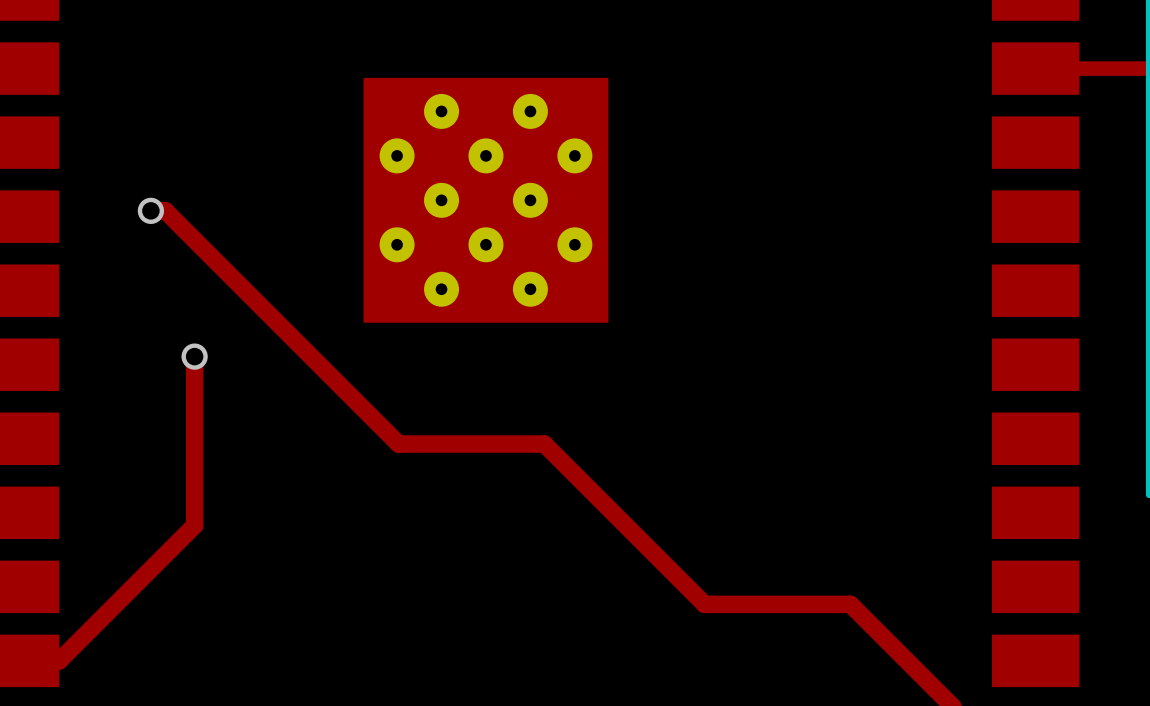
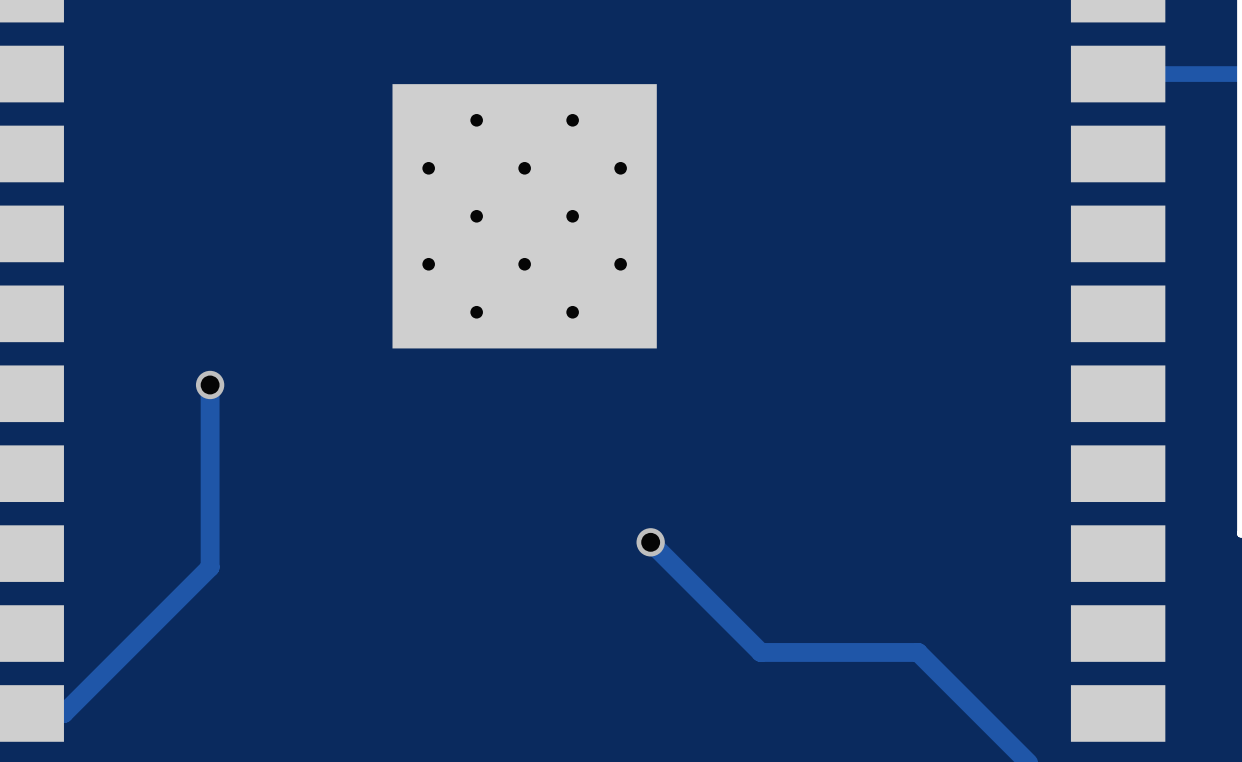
track: (150, 210) (165, 210) (398, 444) (544, 444) (602, 502) -> none
via: (150, 210) -> none
via: none -> (650, 542)

